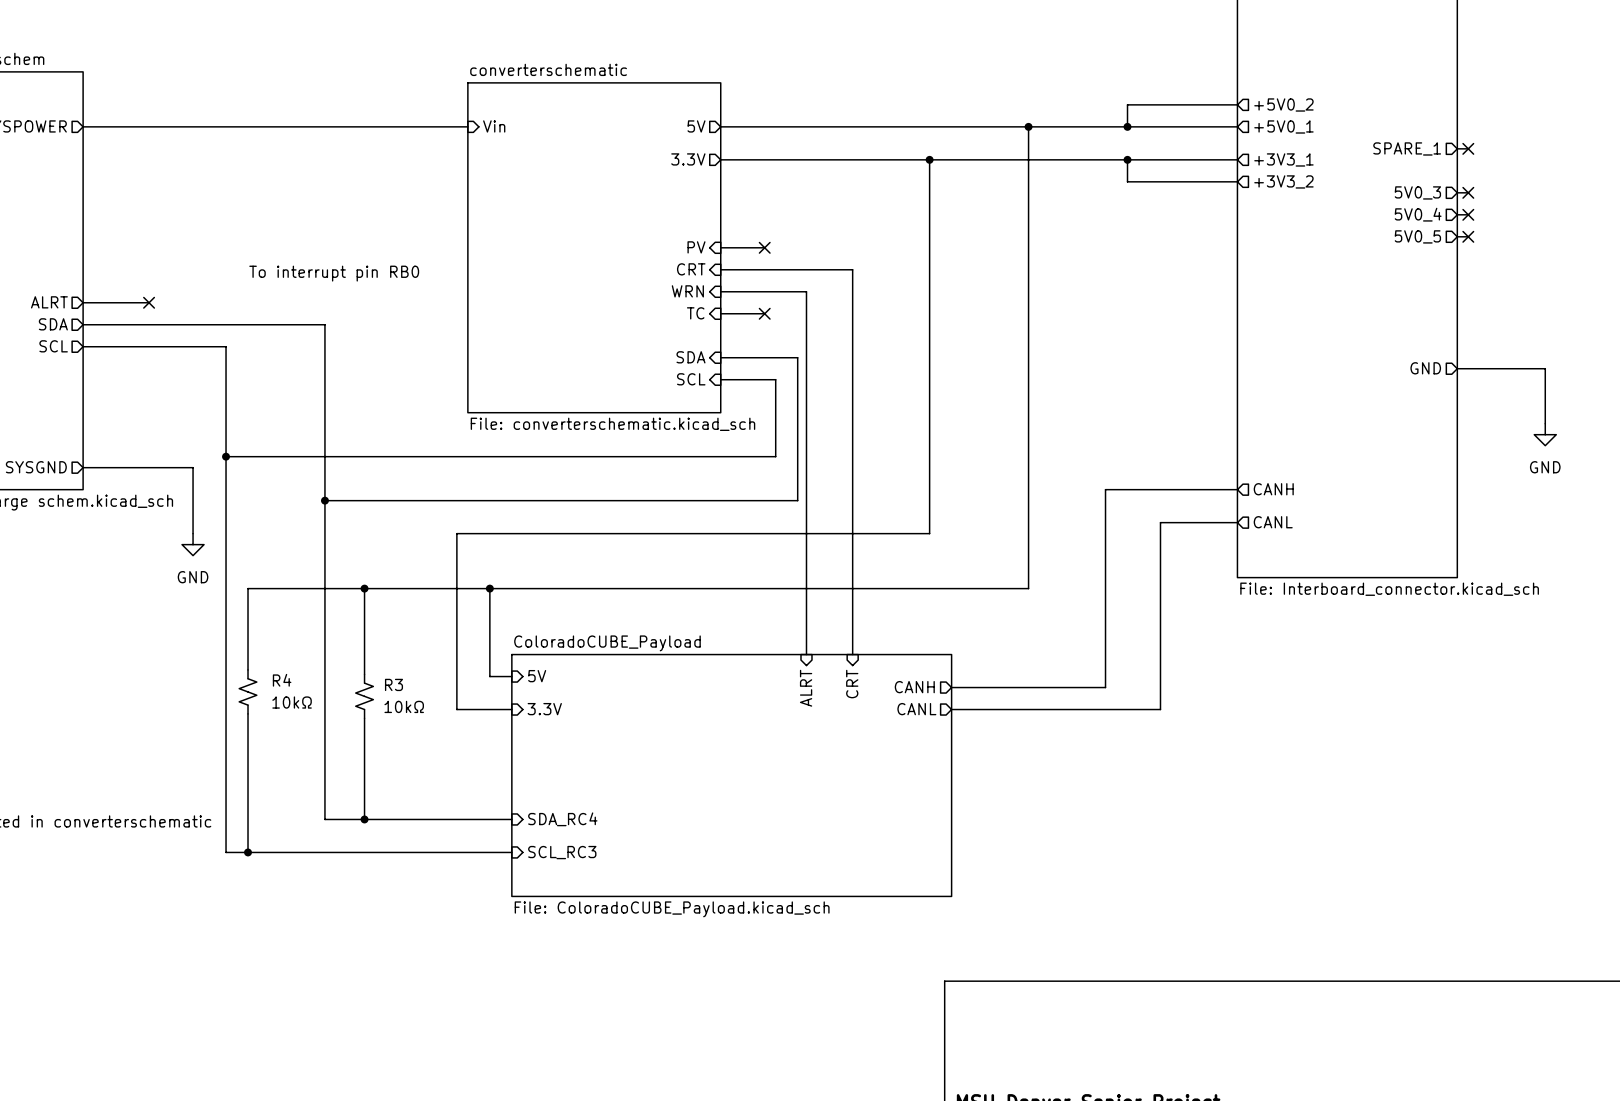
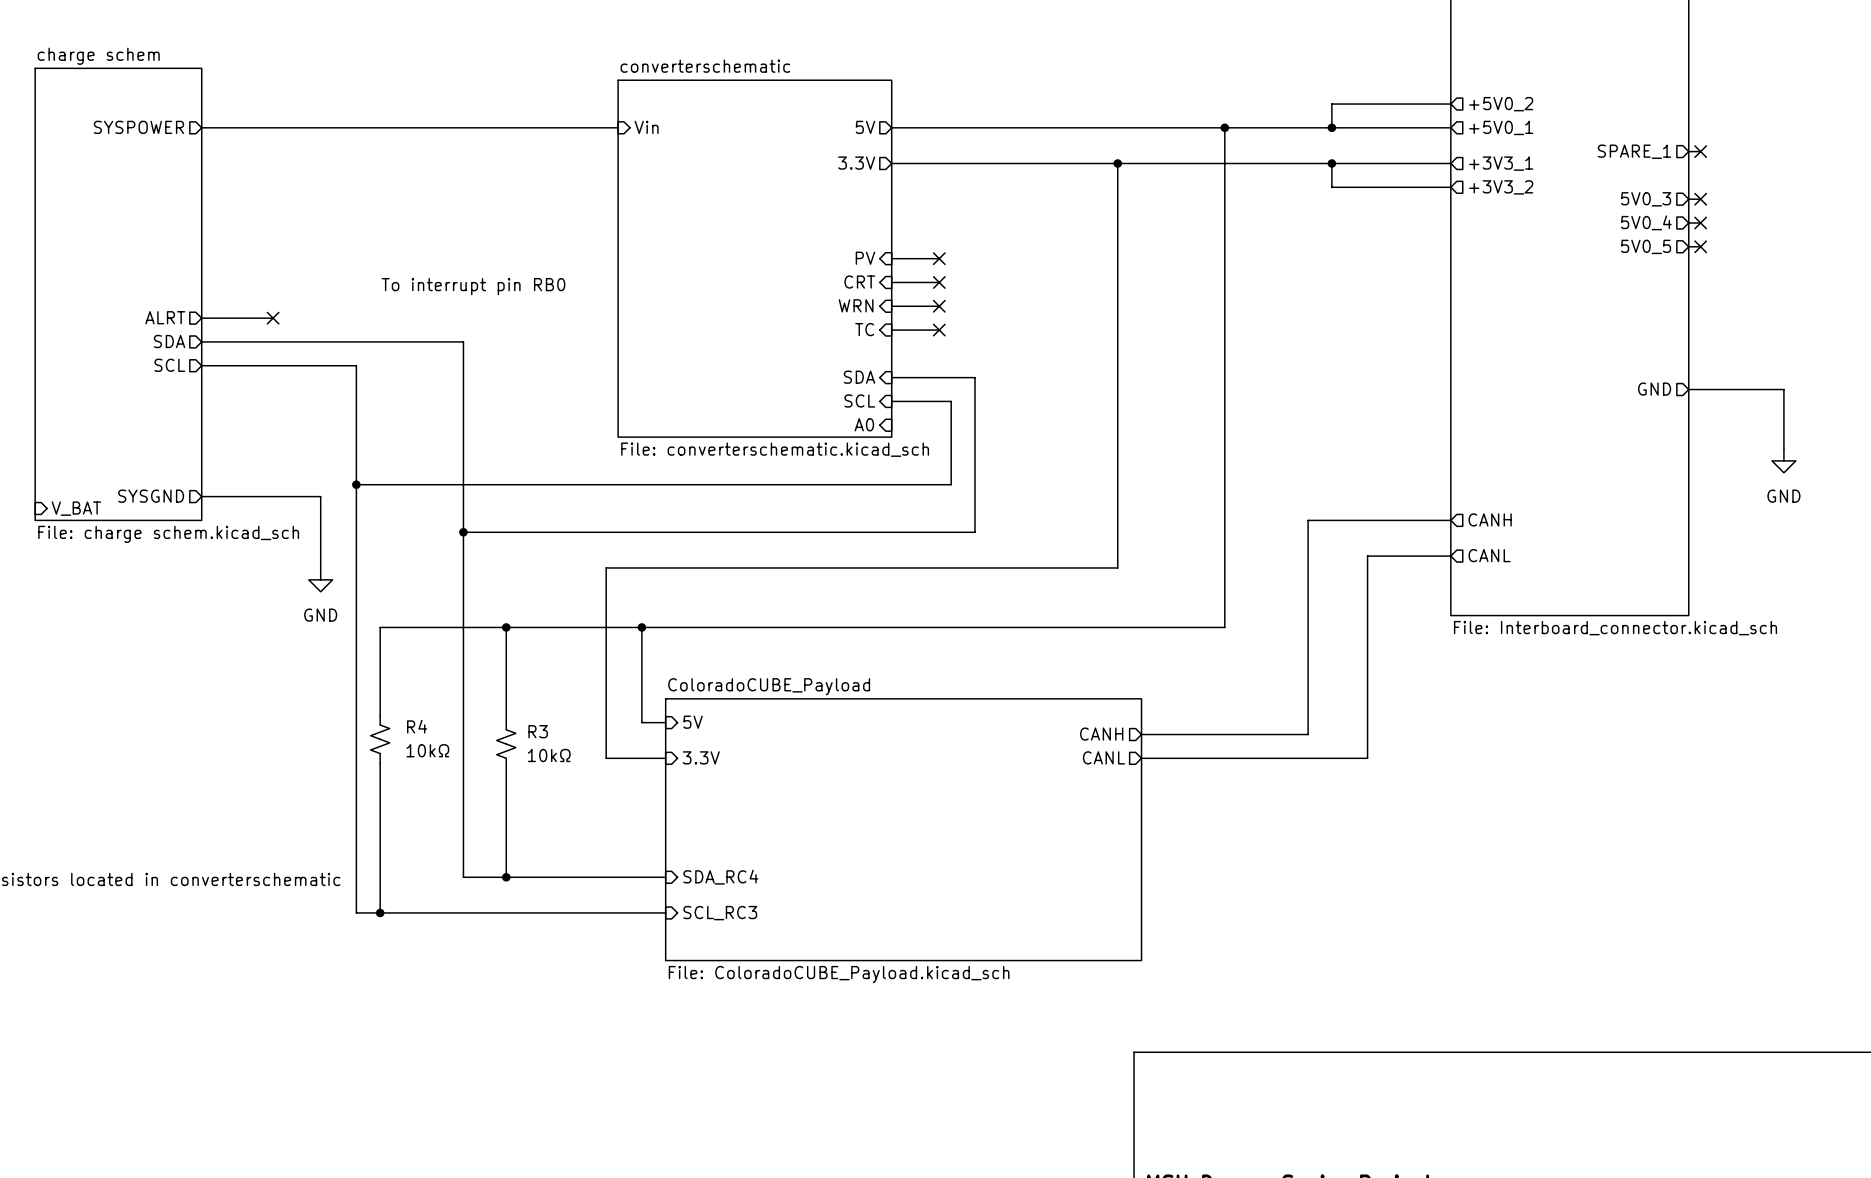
wire: (764, 269) (852, 269) (852, 654) -> none
no-connect mark: none -> (939, 282)
wire: (764, 291) (806, 291) (806, 654) -> none
no-connect mark: none -> (939, 306)
sheet pin: none -> A0 (864, 424)
sheet pin: CRT (852, 684) -> none
sheet pin: ALRT (806, 688) -> none

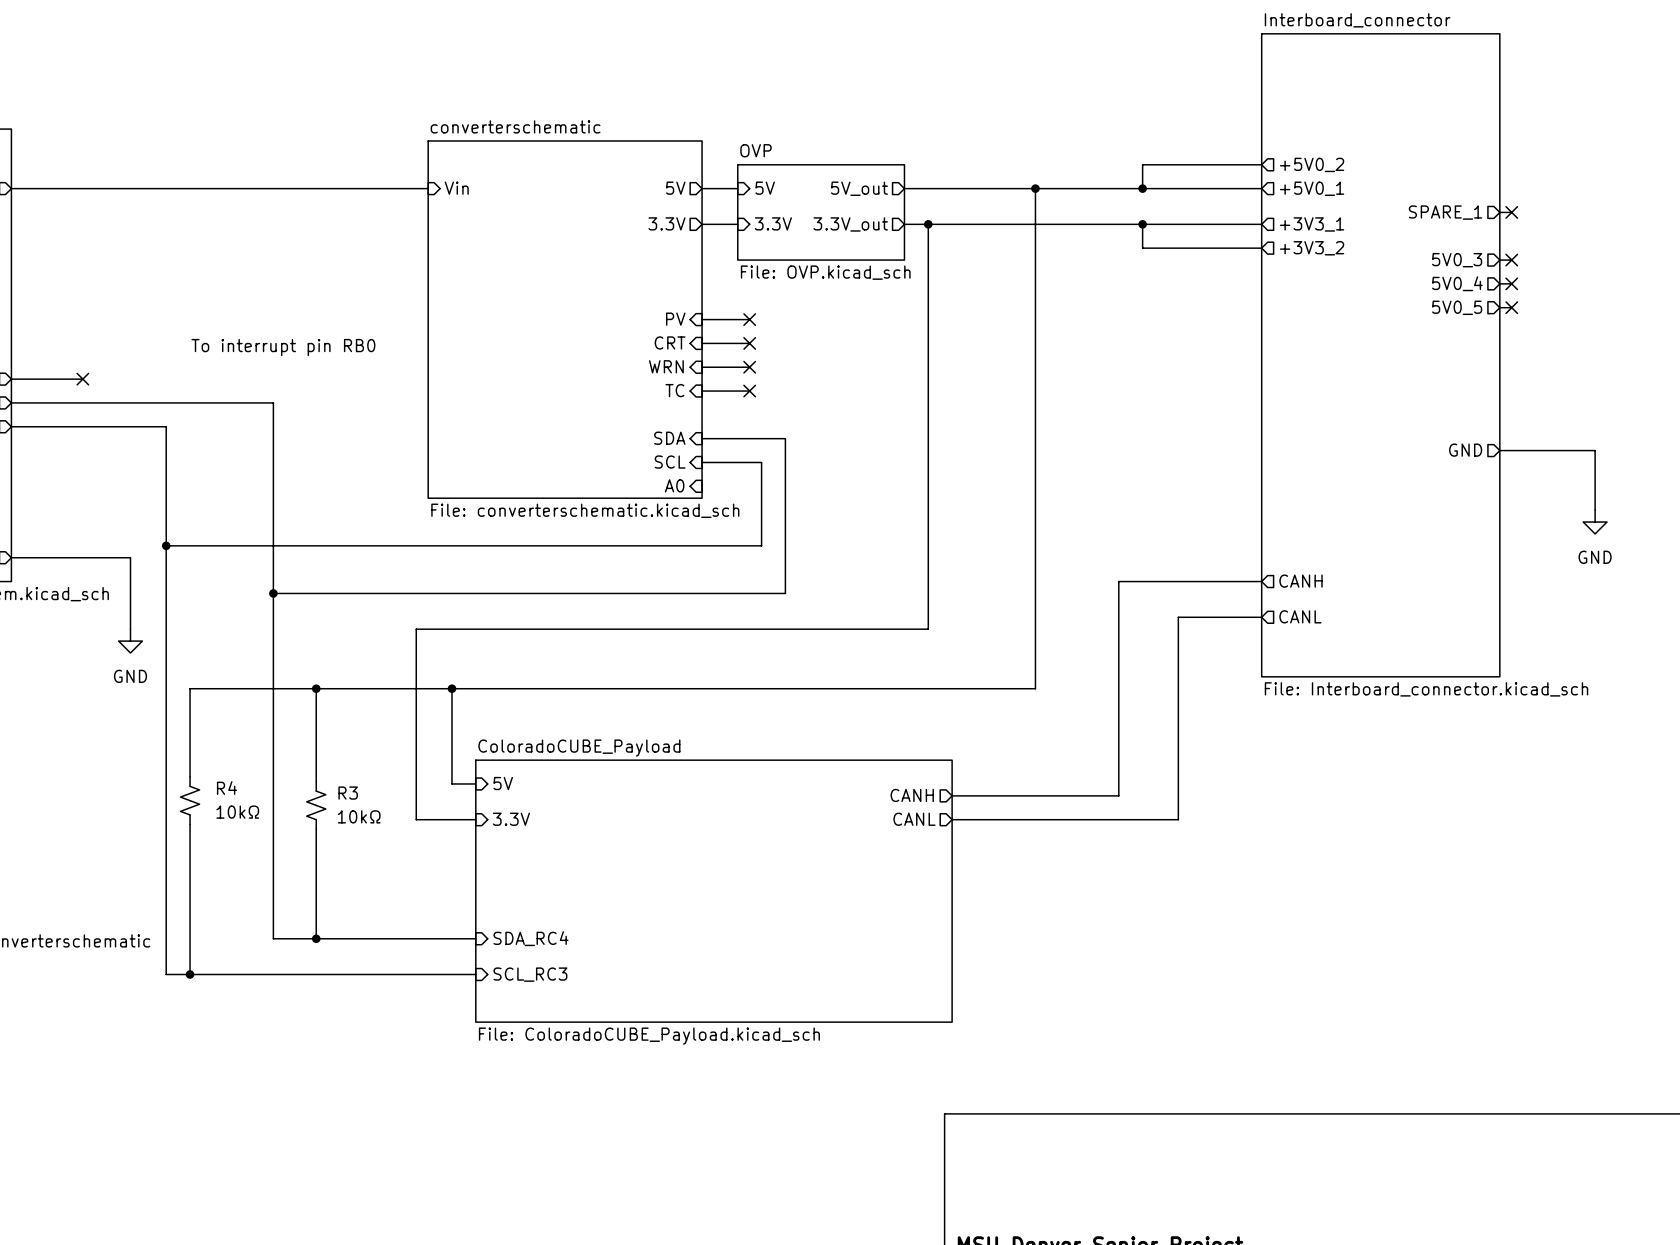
wire: (927, 127) (1093, 127) -> none
sheet pin: none -> 5V (765, 188)
sheet pin: none -> 5V_out (859, 188)
sheet OVP: none -> File: OVP.kicad_sch (821, 212)
wire: (927, 163) (1093, 163) -> none
sheet pin: none -> 3.3V (773, 223)
sheet pin: none -> 3.3V_out (850, 224)

